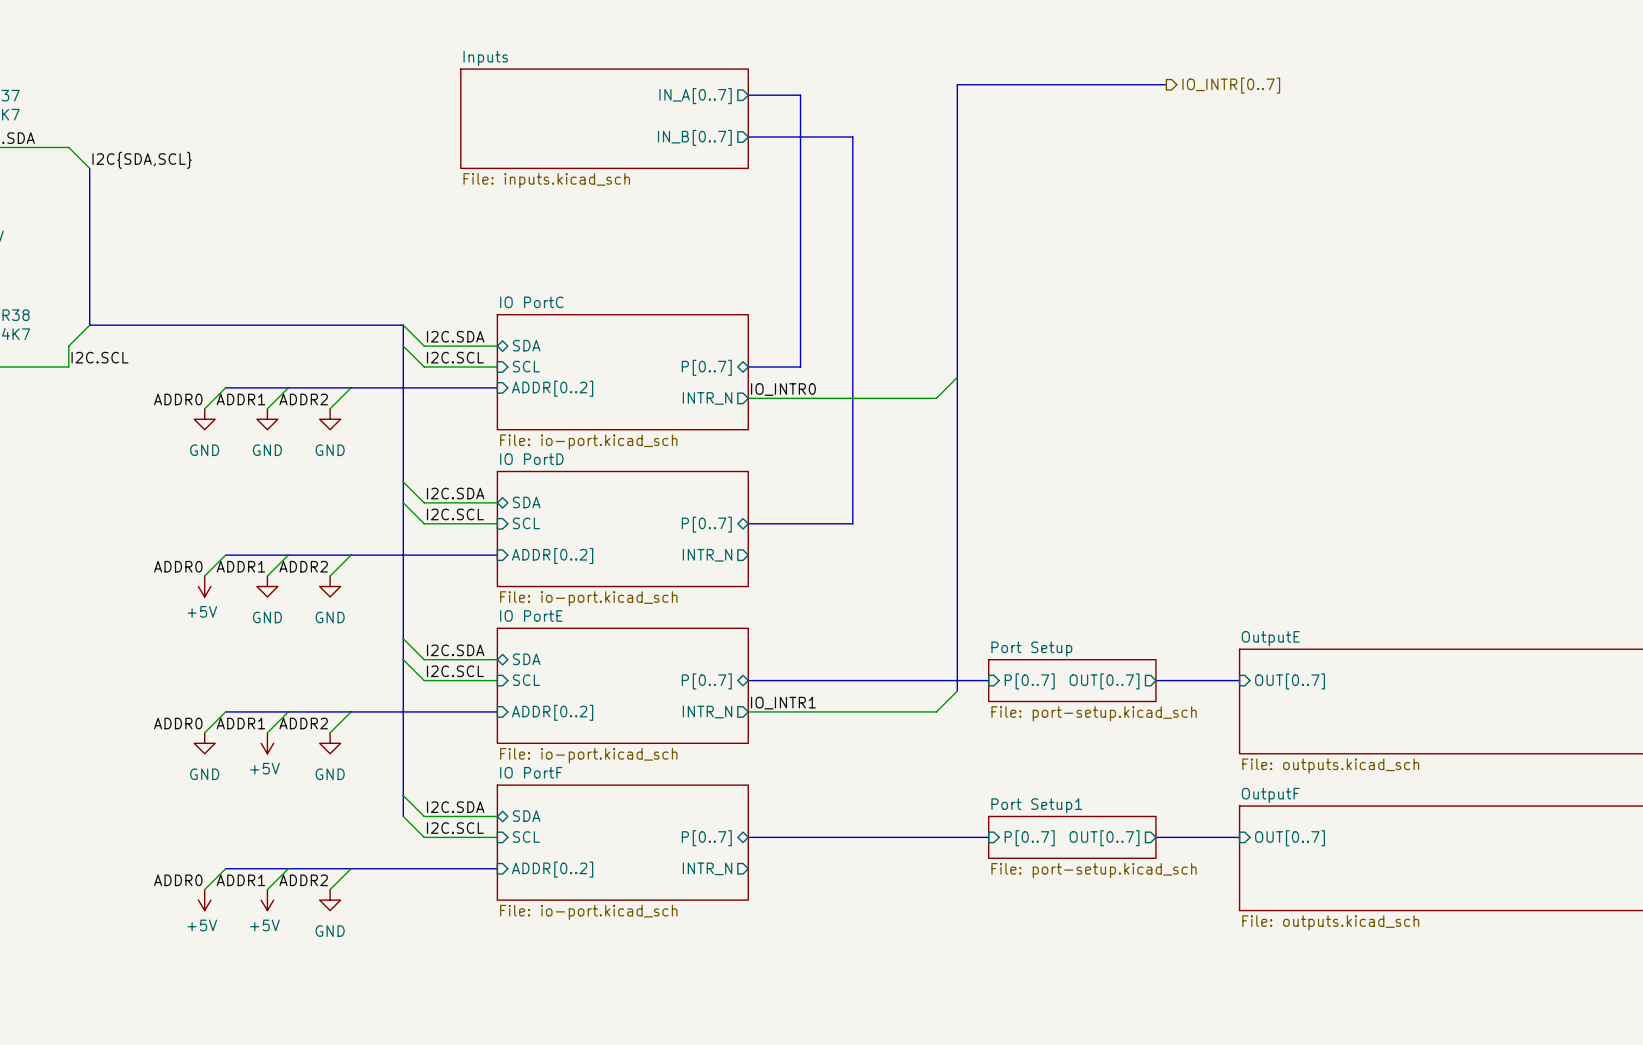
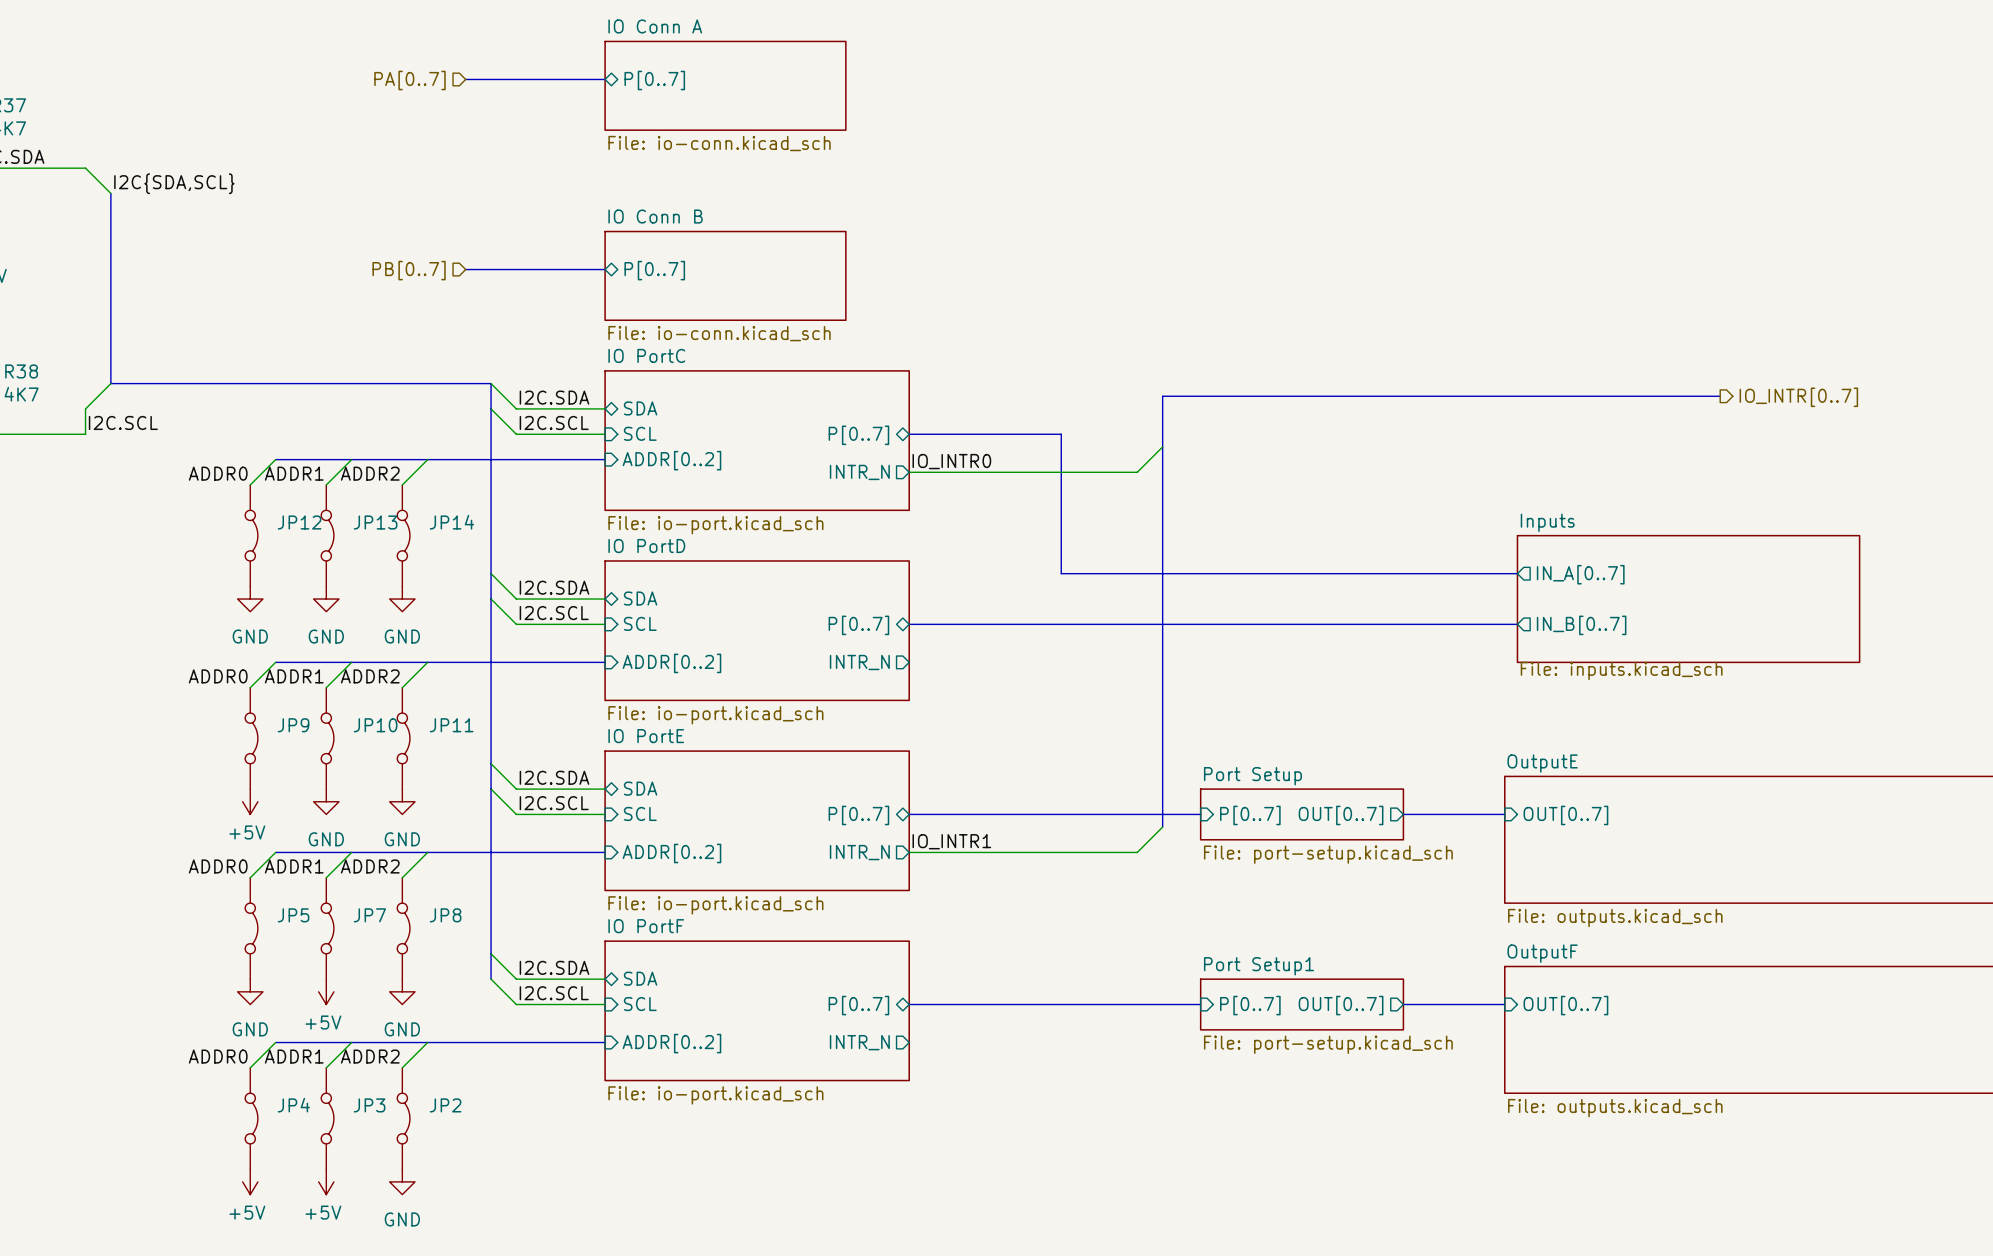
bus: none -> (465, 79) (605, 79)
hierarchical label: none -> PA[0..7] (409, 80)
sheet pin: none -> P[0..7] (654, 80)
sheet IO Conn A: none -> File: io-conn.kicad_sch (725, 85)
bus: (1166, 84) (957, 84) (957, 335) -> (1720, 396) (1162, 396)
hierarchical label: IO_INTR[0..7] (1231, 85) -> none
bus: (748, 95) (800, 95) (800, 366) -> (1517, 573) (1061, 573) (1061, 434) (972, 434)
sheet pin: IN_A[0..7] (695, 96) -> none
sheet Inputs: File: inputs.kicad_sch (604, 118) -> none
sheet pin: IN_B[0..7] (694, 137) -> none
bus: (748, 137) (852, 137) (852, 523) -> (1517, 624) (1035, 624)
hierarchical label: none -> PB[0..7] (409, 270)
bus: none -> (465, 269) (605, 269)
sheet pin: none -> P[0..7] (654, 270)
sheet IO Conn B: none -> File: io-conn.kicad_sch (725, 275)
hierarchical label: none -> IO_INTR[0..7] (1798, 397)
power symbol: GND (204, 419) -> none
power symbol: GND (267, 419) -> none
power symbol: GND (330, 419) -> none
JP12: none -> (251, 535)
JP13: none -> (327, 535)
JP14: none -> (403, 535)
sheet pin: none -> IN_A[0..7] (1580, 574)
power symbol: none -> GND (250, 599)
power symbol: none -> GND (326, 599)
power symbol: none -> GND (402, 599)
sheet Inputs: none -> File: inputs.kicad_sch (1688, 599)
sheet pin: none -> IN_B[0..7] (1581, 625)
power symbol: +5V (204, 586) -> none
power symbol: GND (267, 586) -> none
power symbol: GND (330, 586) -> none
JP9: none -> (251, 738)
JP10: none -> (327, 738)
JP11: none -> (403, 738)
power symbol: none -> +5V (250, 801)
power symbol: none -> GND (326, 801)
power symbol: none -> GND (402, 801)
power symbol: GND (204, 743) -> none
power symbol: +5V (267, 743) -> none
power symbol: GND (330, 743) -> none
JP5: none -> (251, 928)
JP7: none -> (327, 928)
JP8: none -> (403, 928)
power symbol: none -> GND (250, 991)
power symbol: none -> +5V (326, 991)
power symbol: none -> GND (402, 991)
power symbol: +5V (204, 900) -> none
power symbol: +5V (267, 900) -> none
power symbol: GND (330, 900) -> none
JP4: none -> (251, 1118)
JP3: none -> (327, 1118)
JP2: none -> (403, 1118)
power symbol: none -> +5V (250, 1181)
power symbol: none -> +5V (326, 1181)
power symbol: none -> GND (402, 1181)

